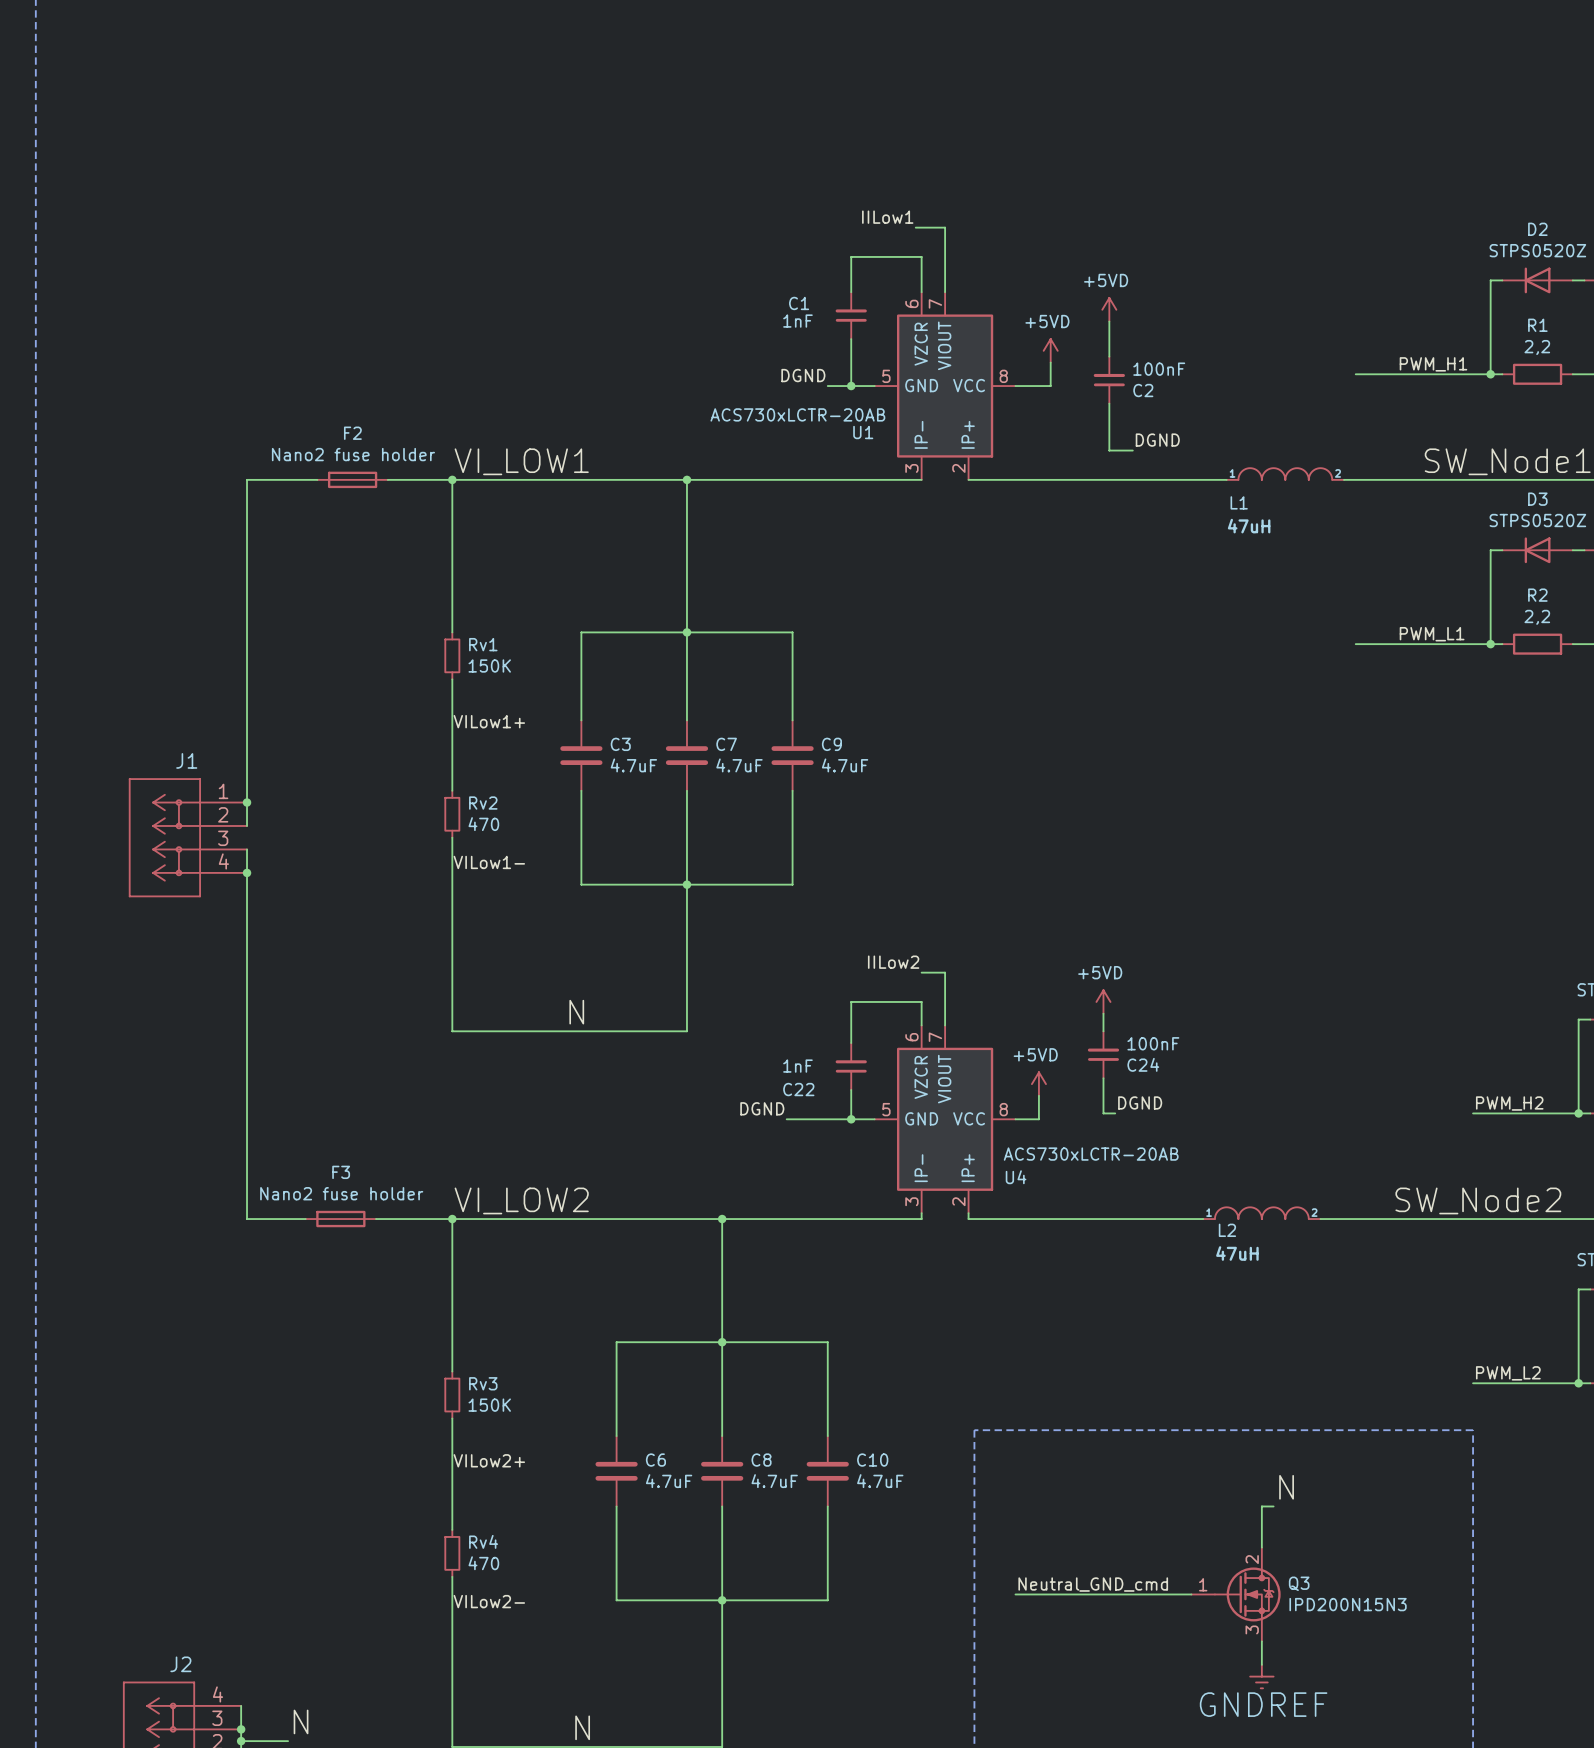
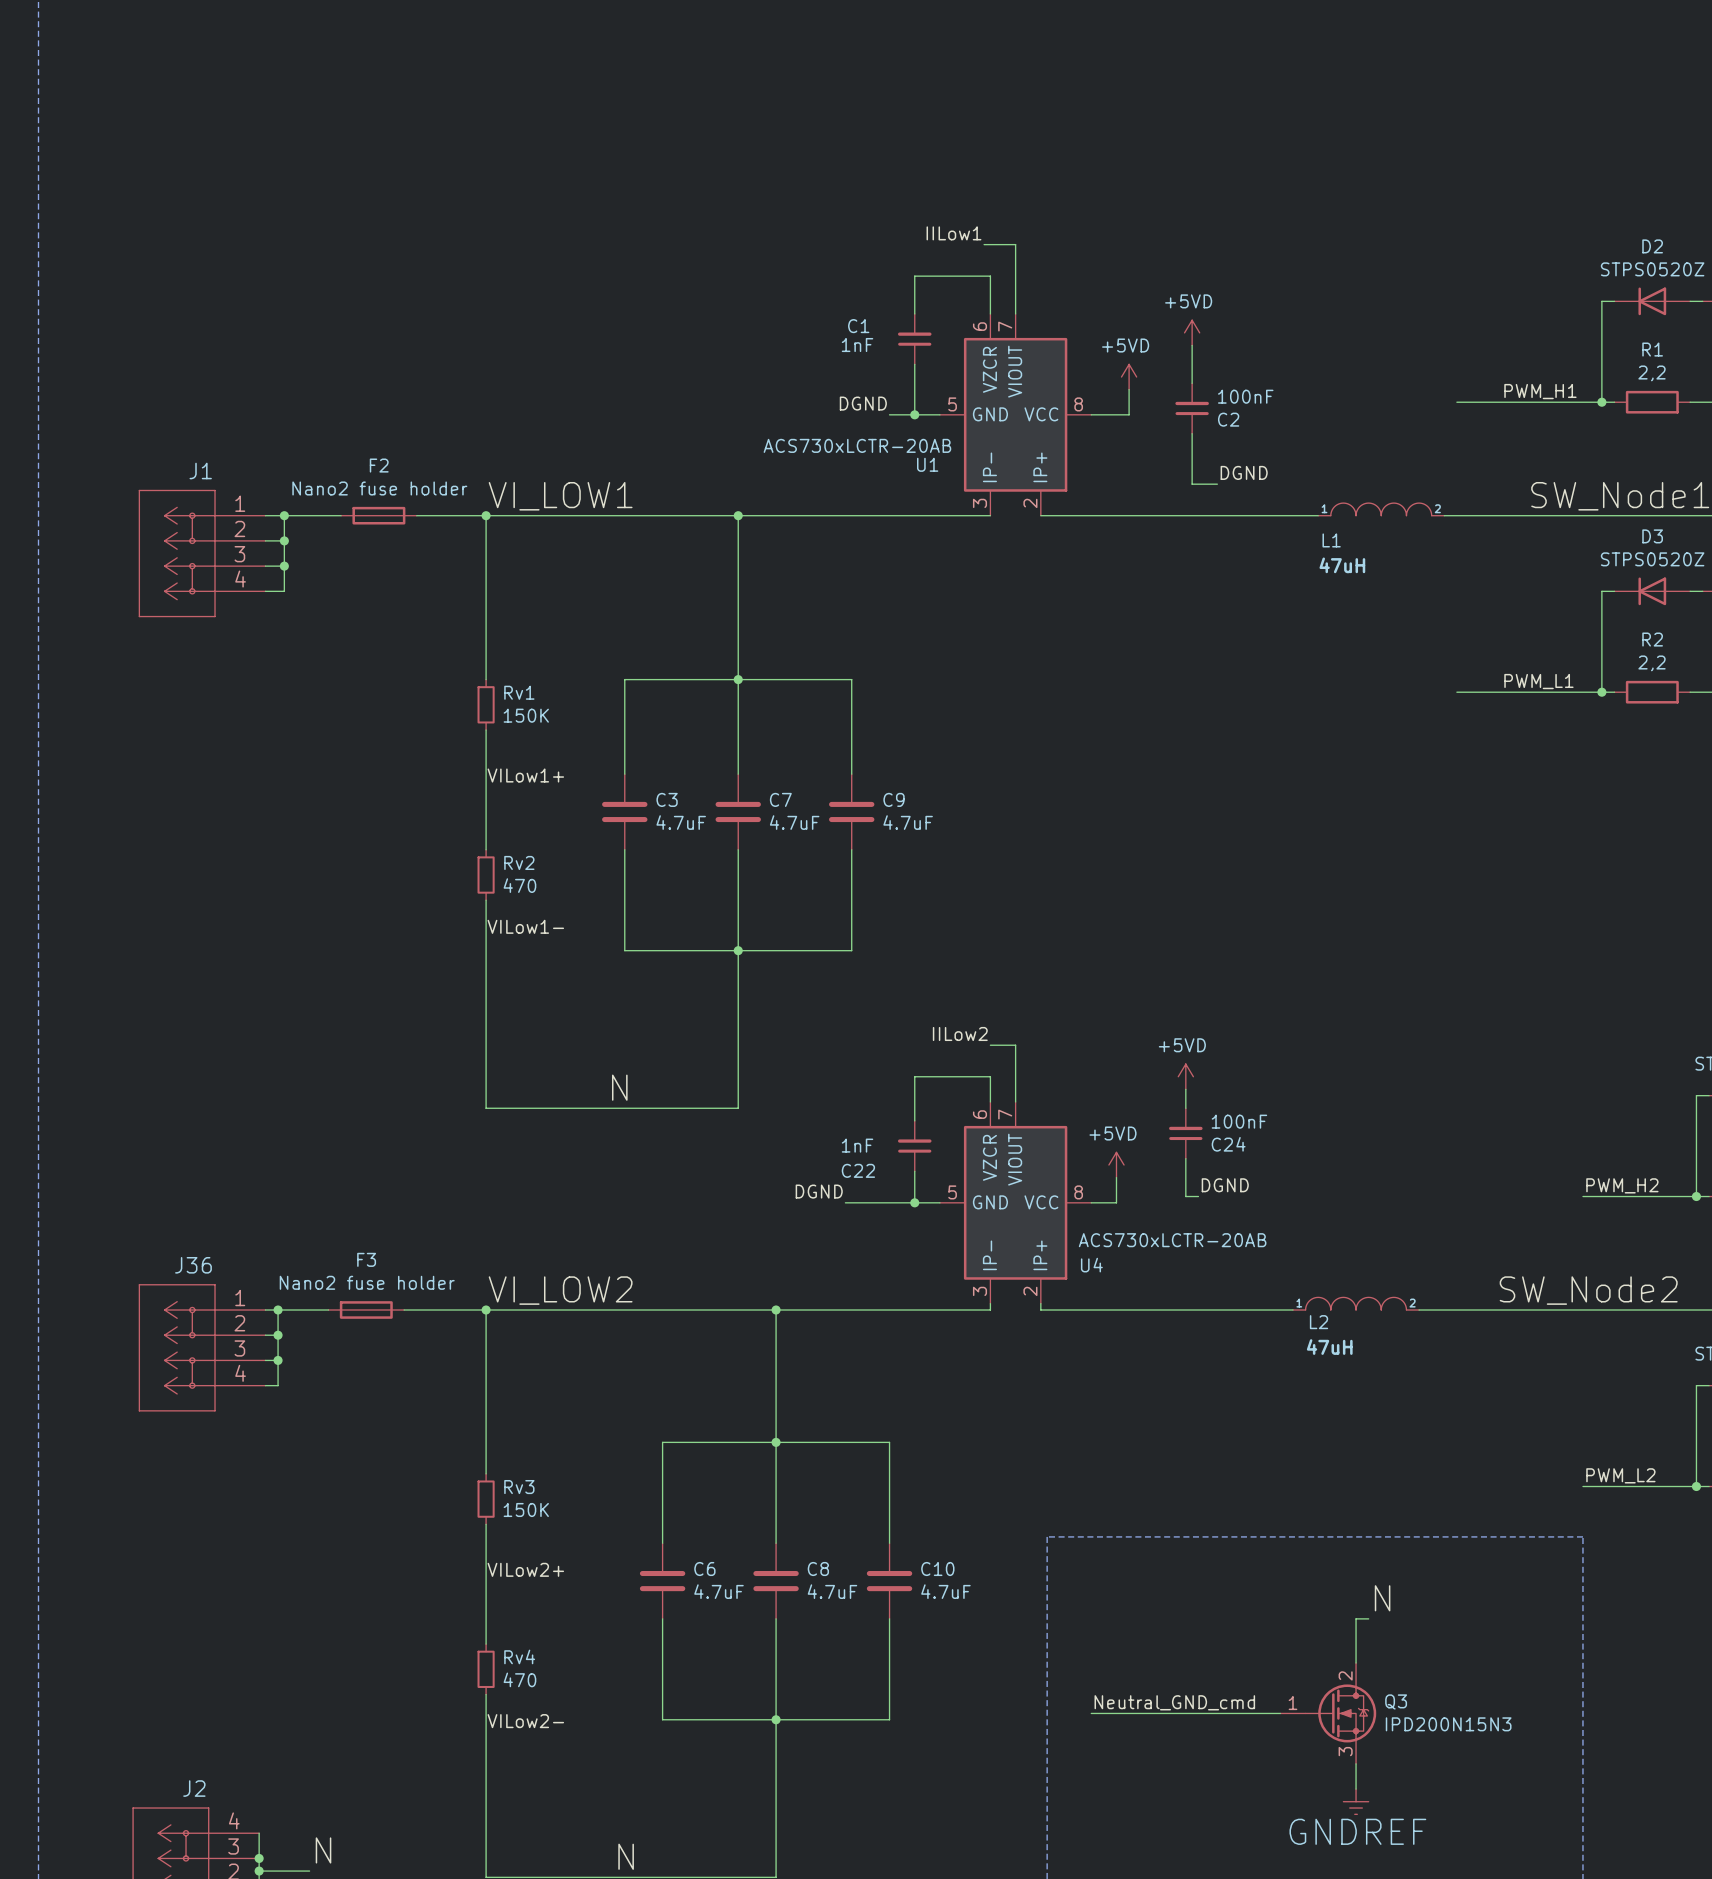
wire: (247, 479) (247, 825) -> none
wire: none -> (284, 515) (284, 591) (265, 591)
junction: none -> (284, 515)
wire: none -> (265, 540) (284, 540)
junction: none -> (284, 540)
wire: none -> (265, 566) (284, 566)
junction: none -> (284, 566)
junction: (247, 802) -> none
J1 position: (188, 837) -> (202, 553)
wire: (247, 849) (247, 1219) -> none
junction: (247, 872) -> none
wire: none -> (278, 1310) (278, 1385) (265, 1385)
junction: none -> (278, 1310)
wire: none -> (265, 1335) (278, 1335)
junction: none -> (278, 1335)
J36: none -> (202, 1347)
wire: none -> (265, 1360) (278, 1360)
junction: none -> (278, 1360)

